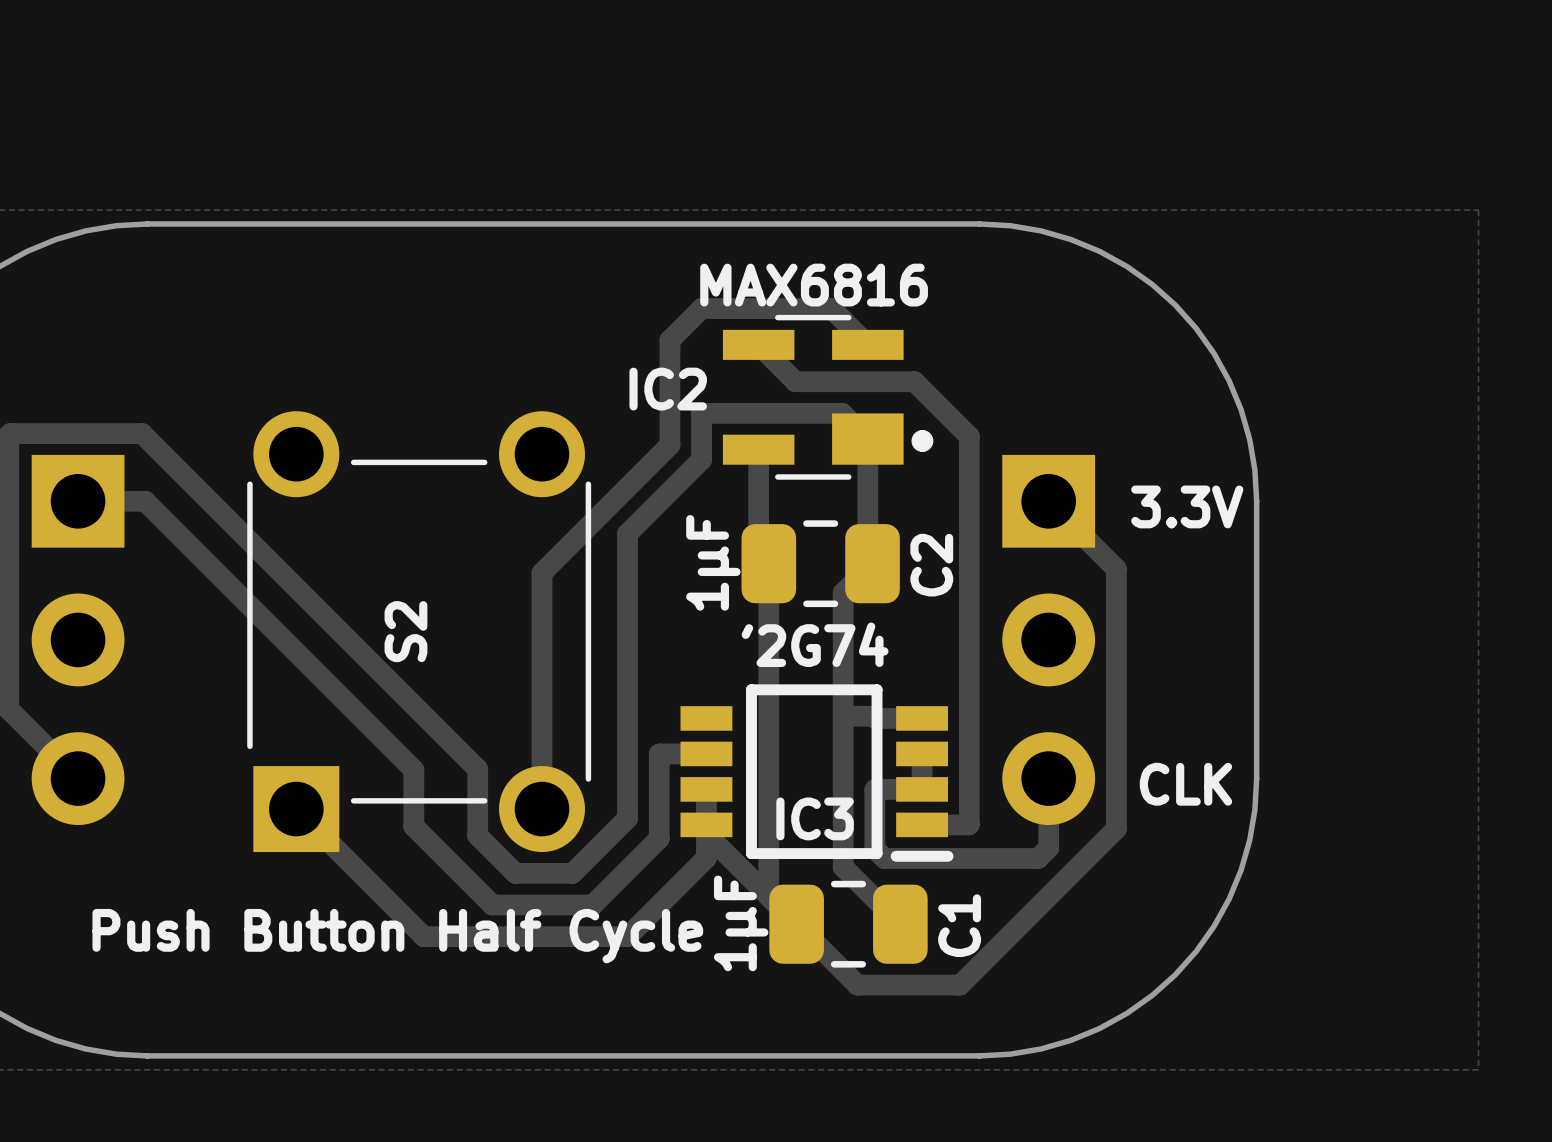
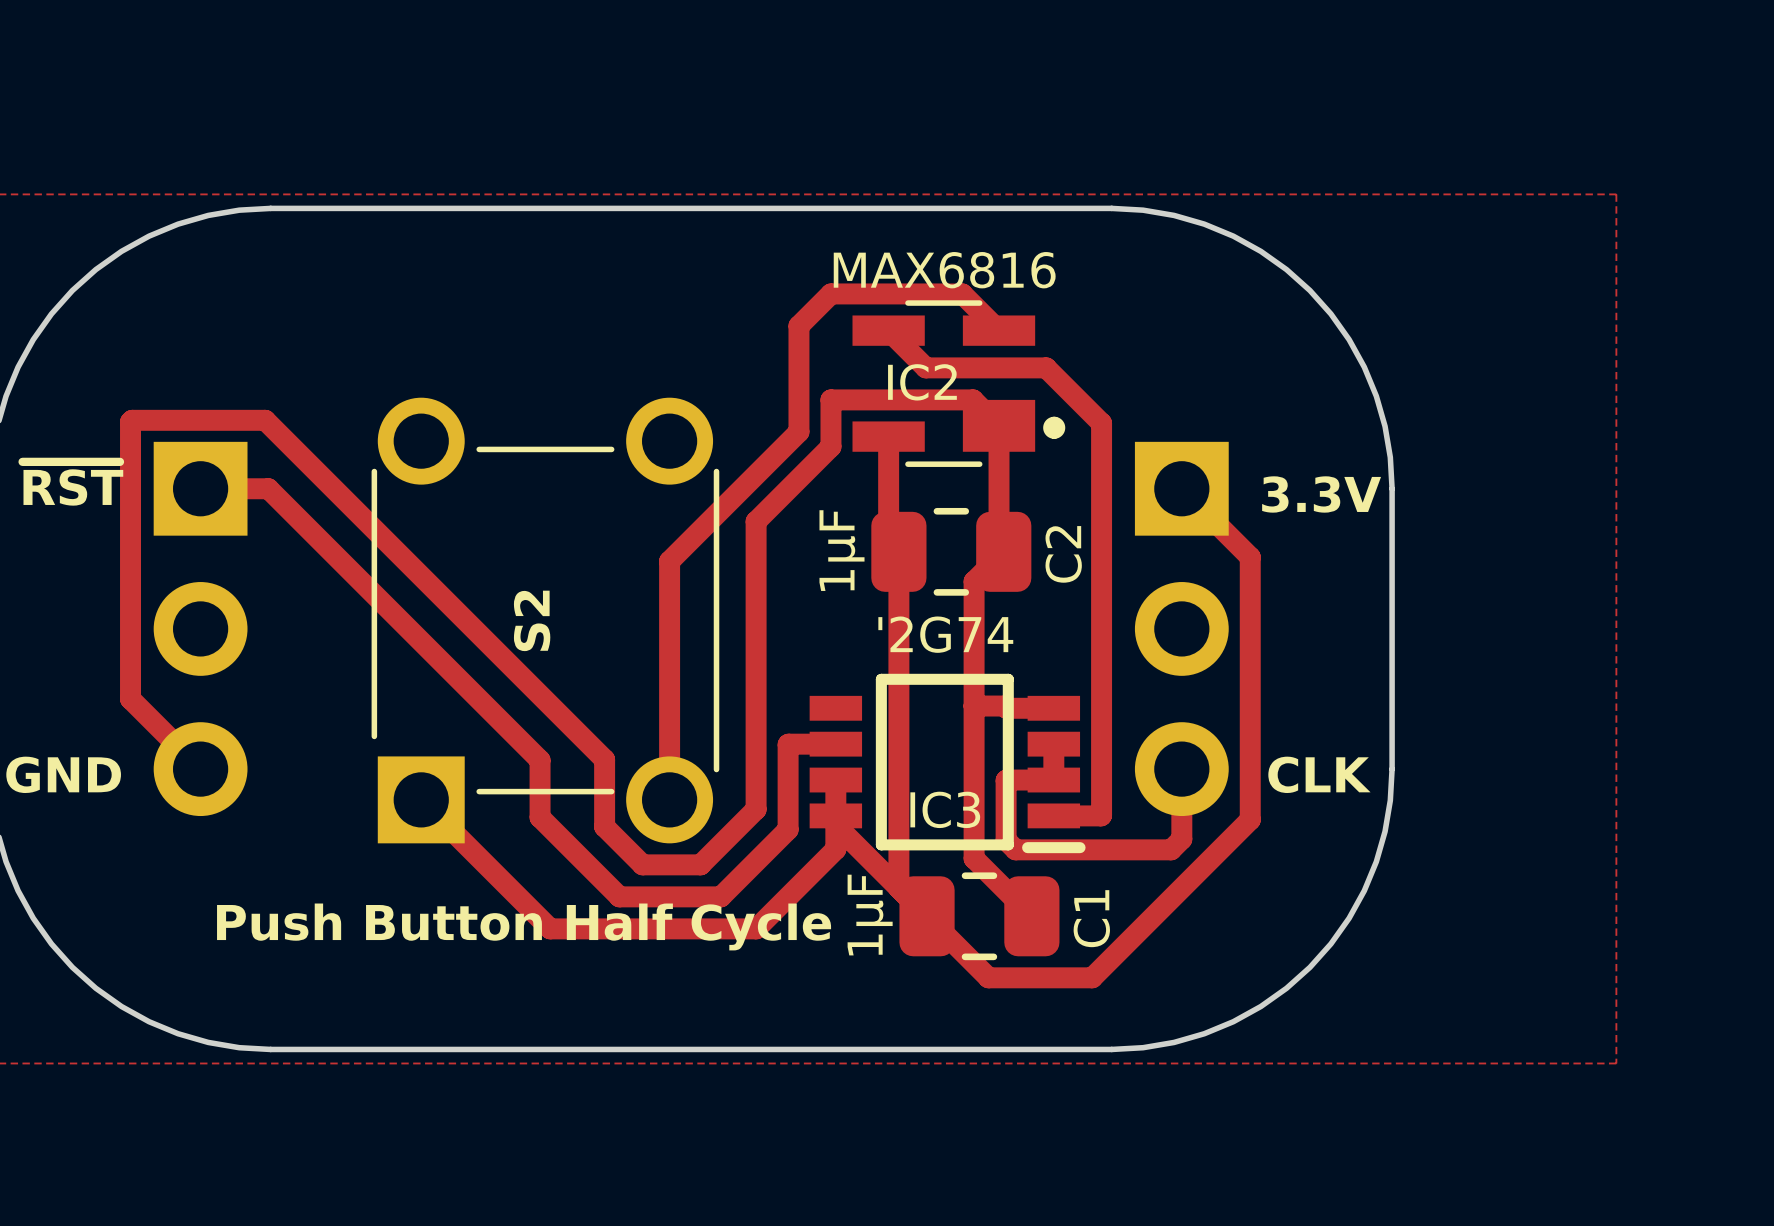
IC2 name position: IC2 (668, 389) -> IC2 (922, 382)

